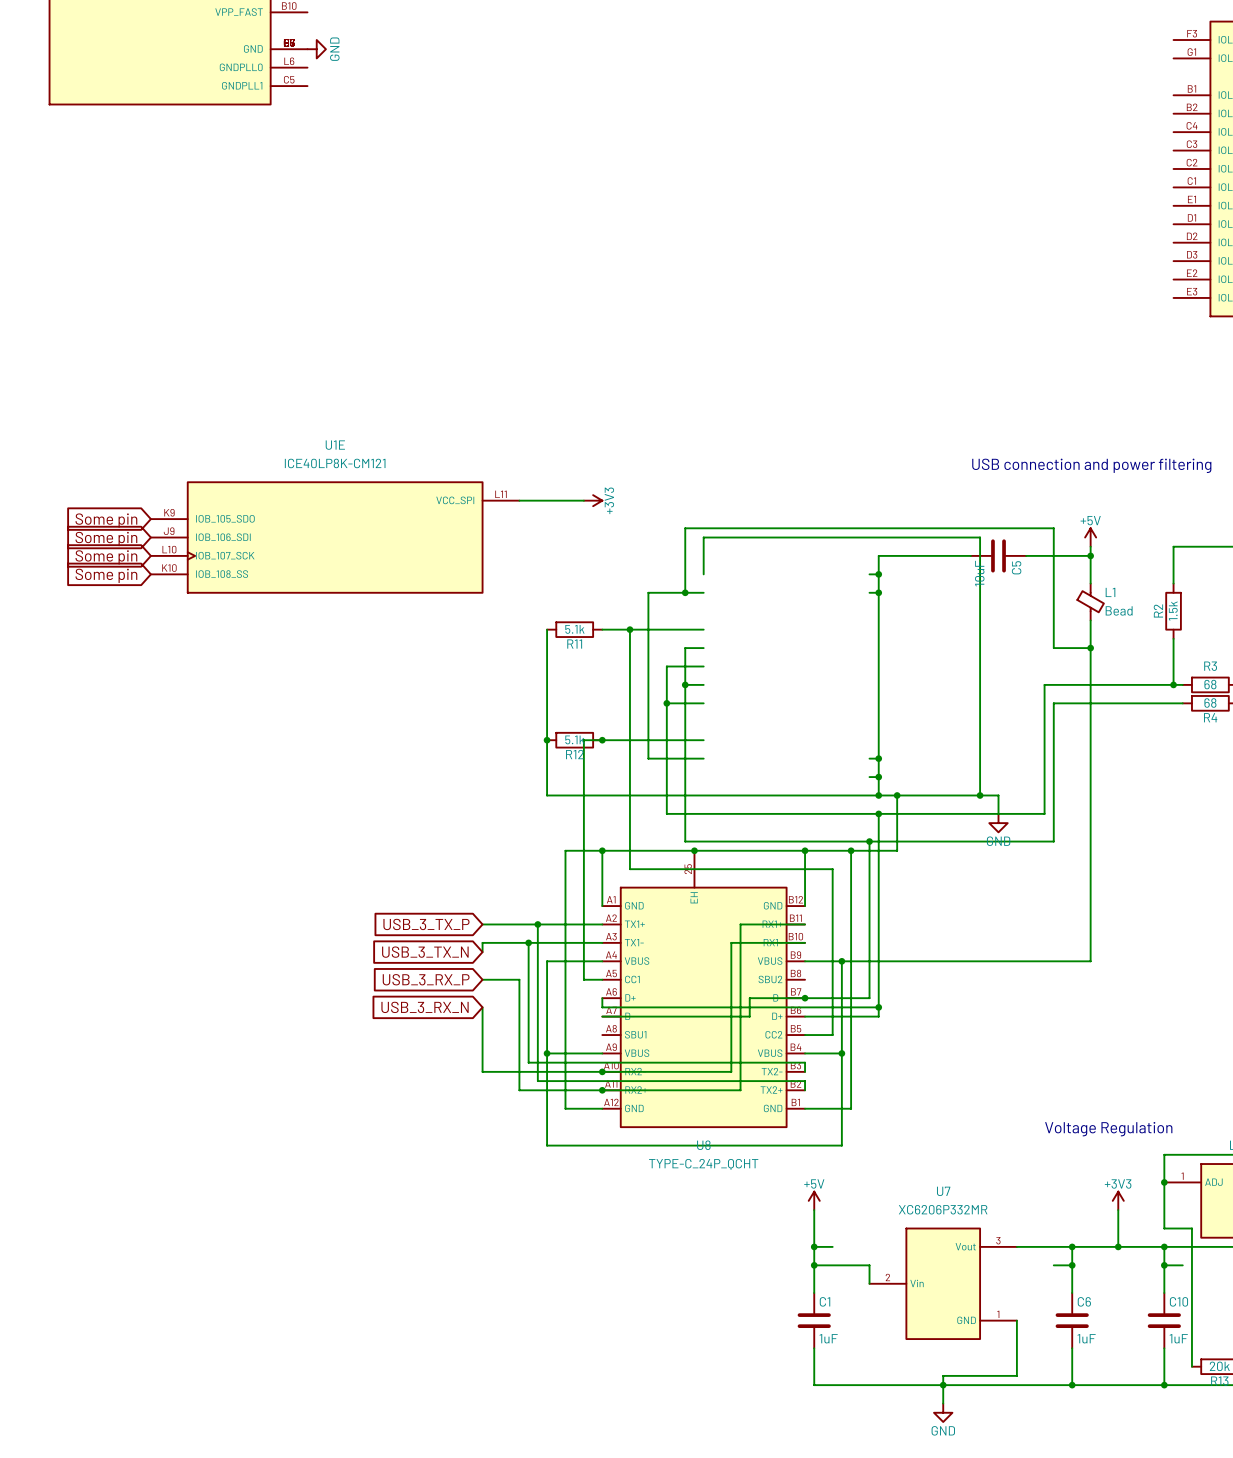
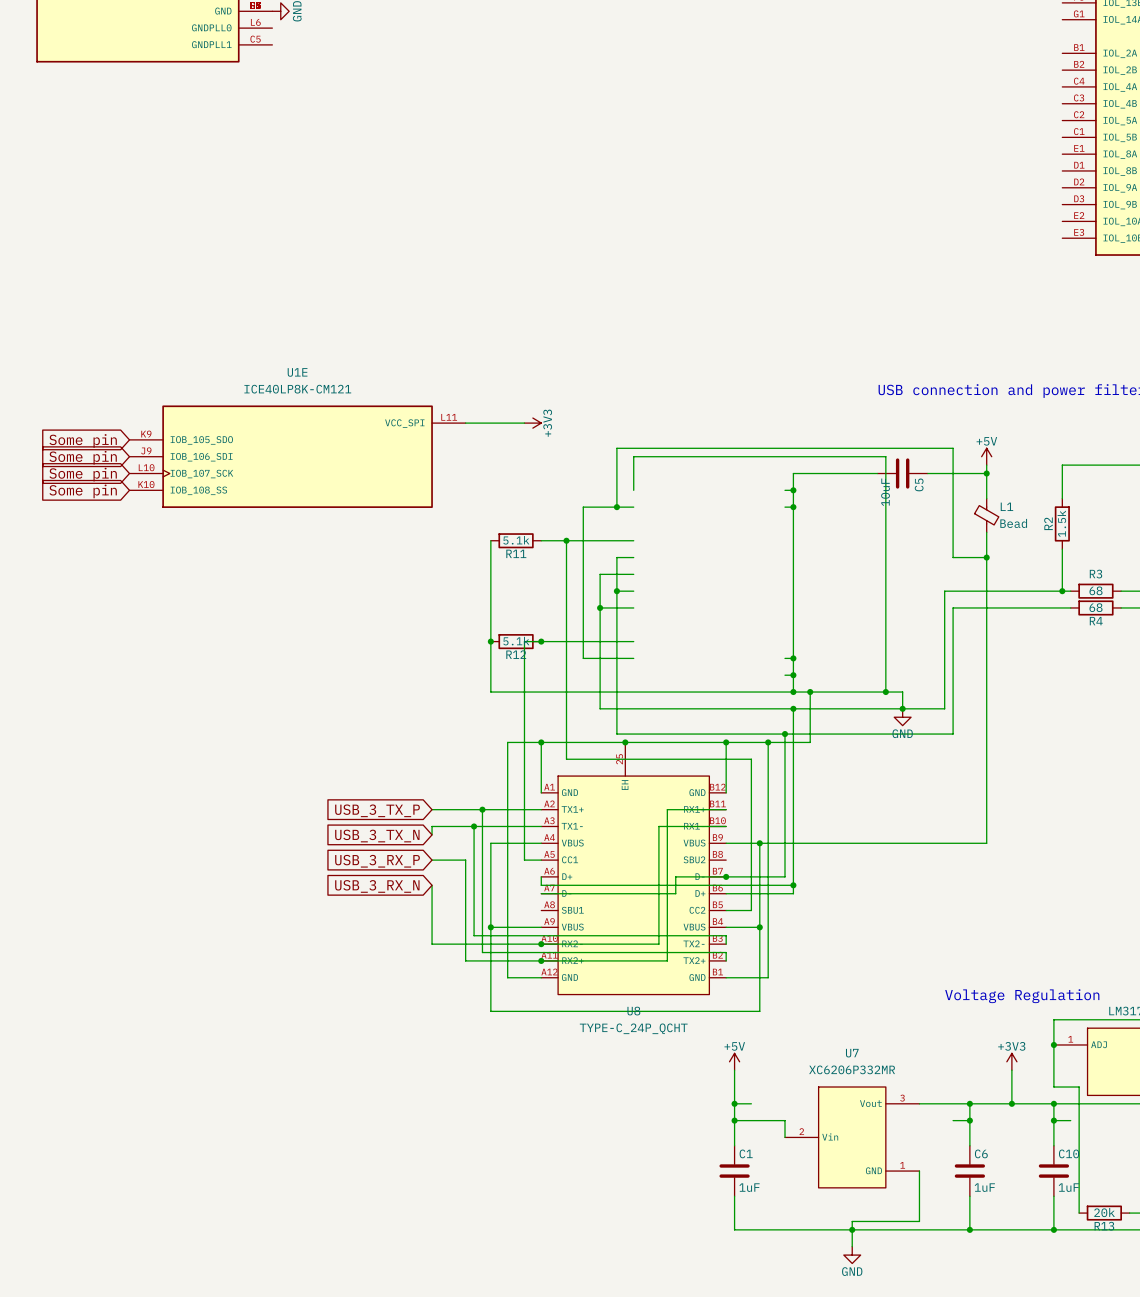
junction: none -> (902, 708)

